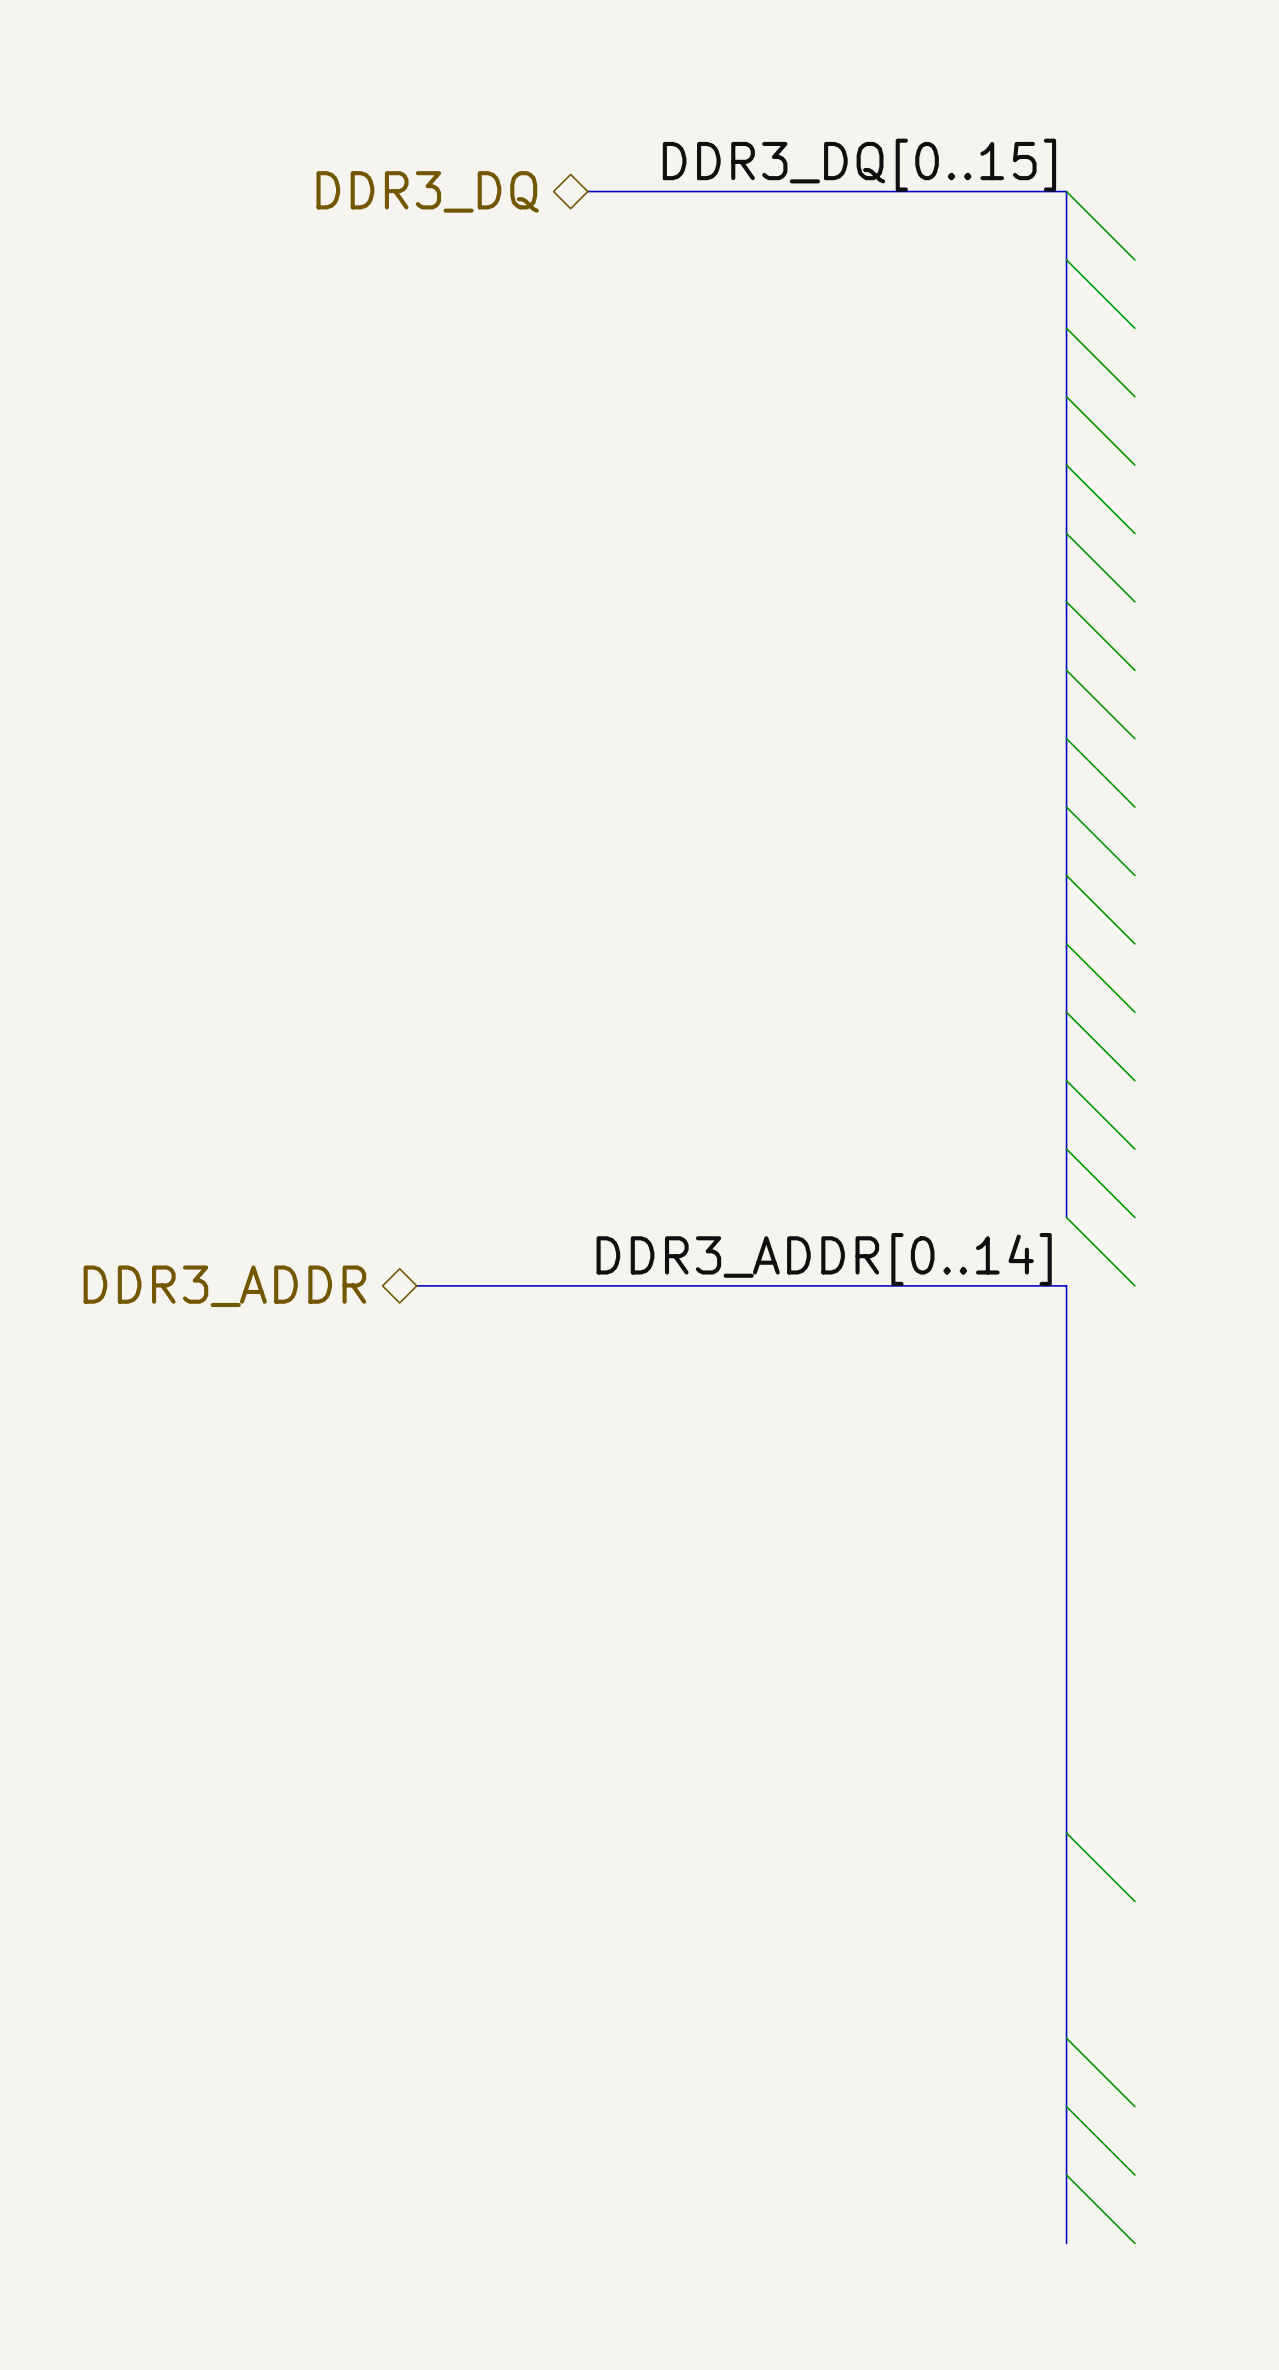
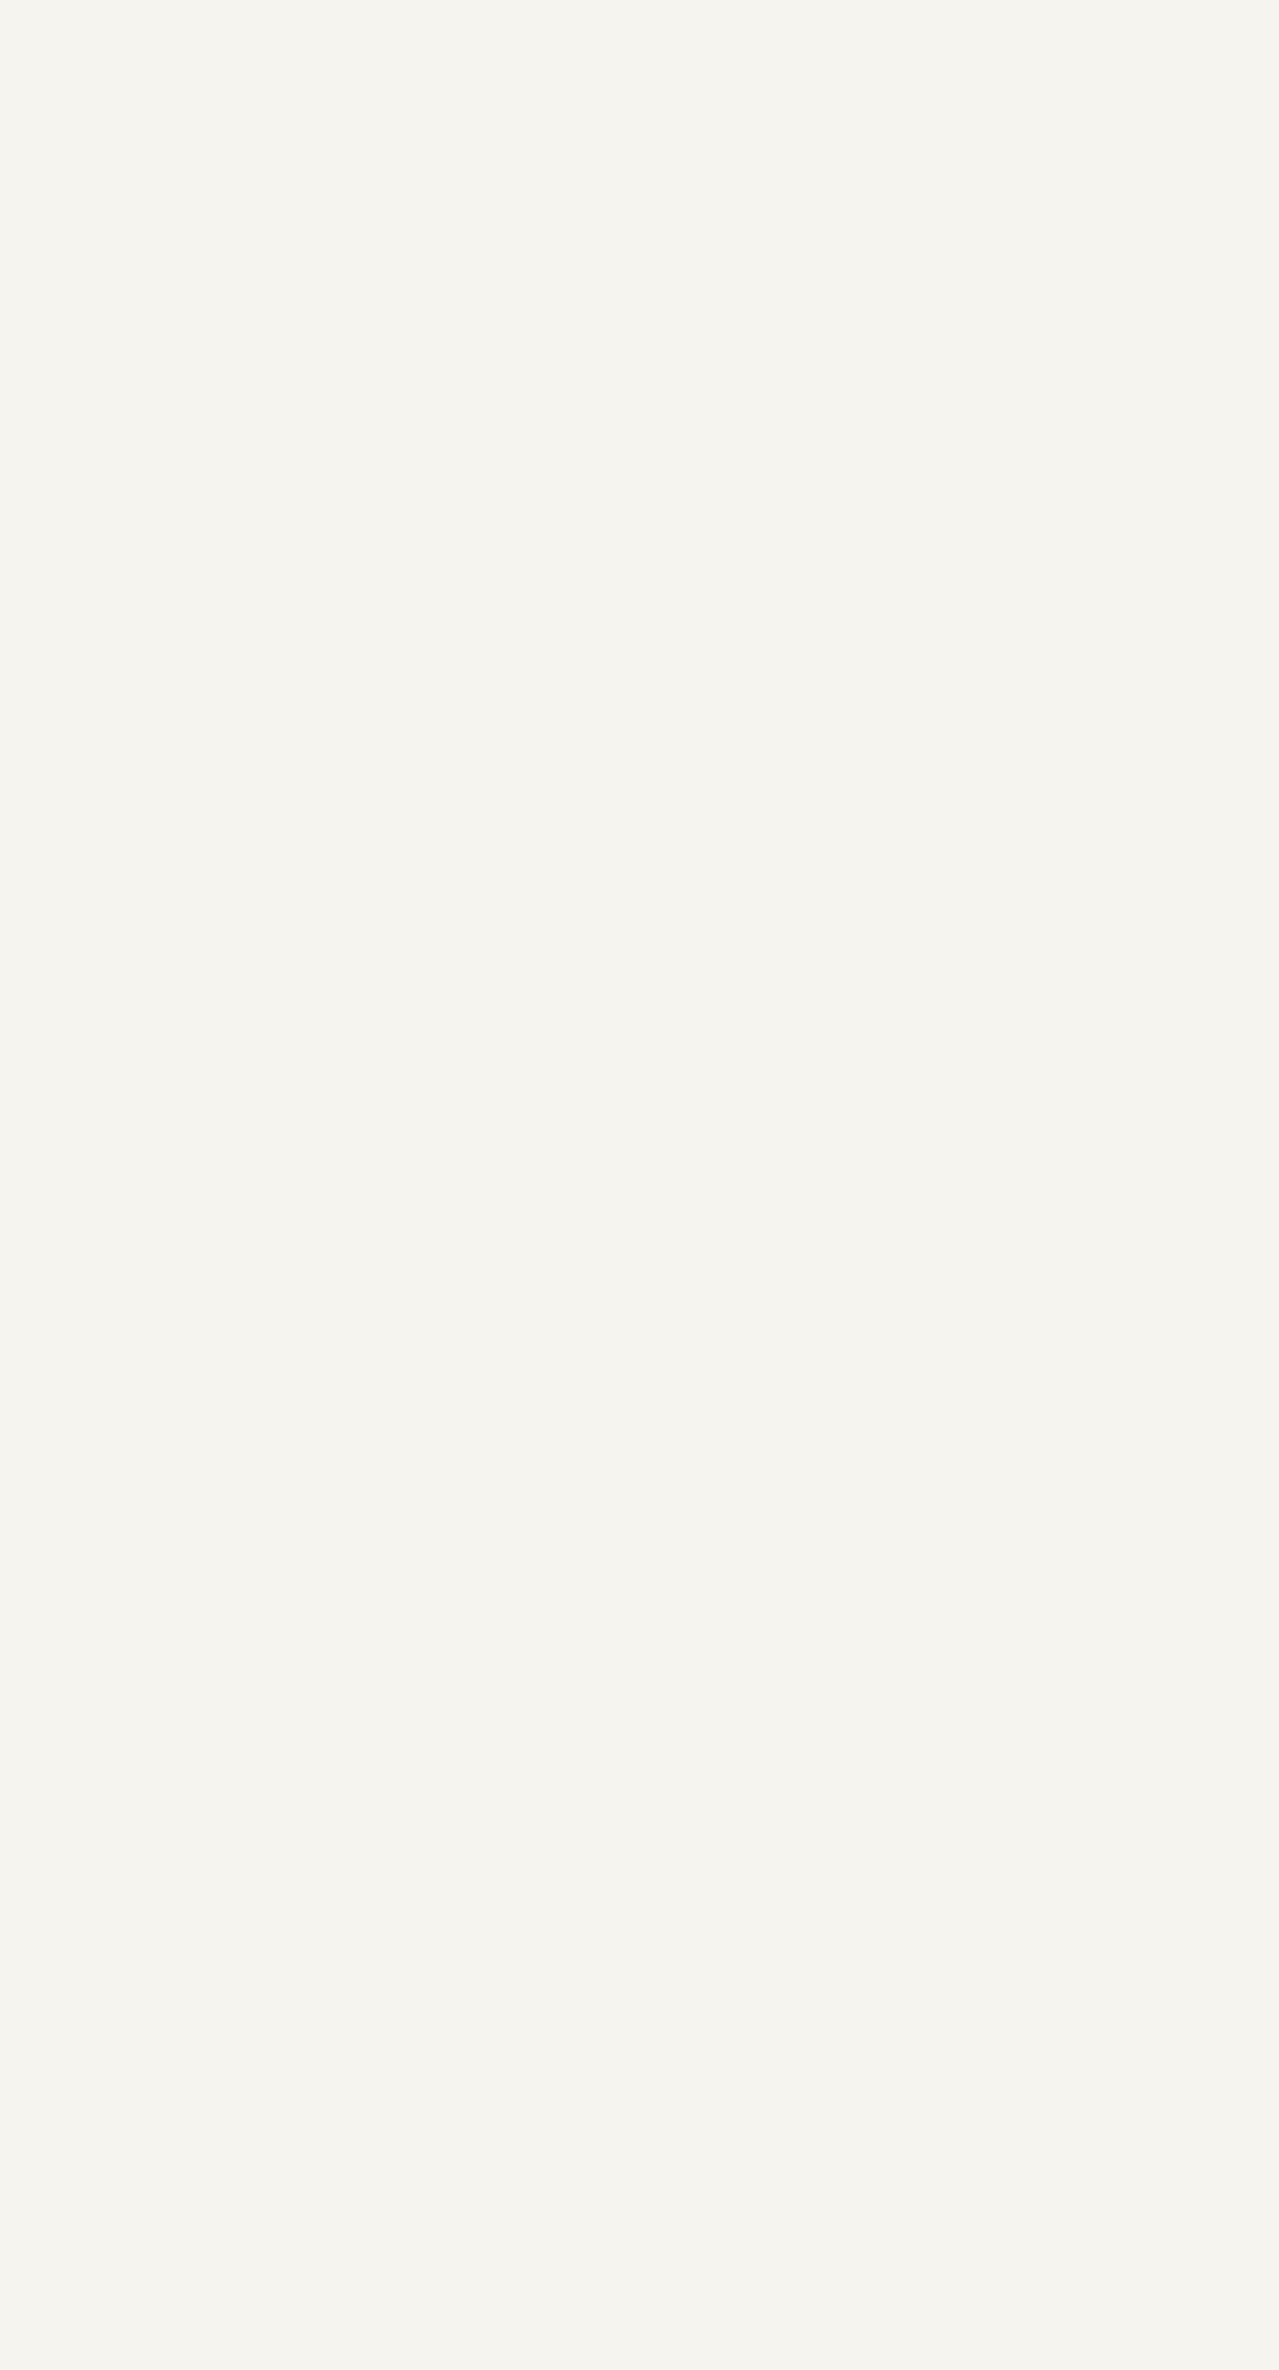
label: DDR3_DQ[0..15] (859, 165) -> none
hierarchical label: DDR3_DQ (427, 191) -> none
bus: (587, 191) (1066, 191) (1066, 1217) -> none
wire: (1066, 191) (1134, 259) -> none
wire: (1066, 259) (1134, 328) -> none
wire: (1066, 328) (1134, 396) -> none
wire: (1066, 396) (1134, 465) -> none
wire: (1066, 465) (1134, 533) -> none
wire: (1066, 533) (1134, 601) -> none
wire: (1066, 601) (1134, 670) -> none
wire: (1066, 670) (1134, 738) -> none
wire: (1066, 738) (1134, 807) -> none
wire: (1066, 807) (1134, 875) -> none
wire: (1066, 875) (1134, 943) -> none
wire: (1066, 943) (1134, 1012) -> none
wire: (1066, 1012) (1134, 1080) -> none
wire: (1066, 1080) (1134, 1149) -> none
wire: (1066, 1149) (1134, 1217) -> none
wire: (1066, 1217) (1134, 1285) -> none
label: DDR3_ADDR[0..14] (824, 1259) -> none
bus: (416, 1285) (1066, 1285) (1066, 2243) -> none
hierarchical label: DDR3_ADDR (224, 1286) -> none
wire: (1066, 1833) (1134, 1901) -> none
wire: (1066, 2038) (1134, 2106) -> none
wire: (1066, 2106) (1134, 2175) -> none
wire: (1066, 2175) (1134, 2243) -> none

